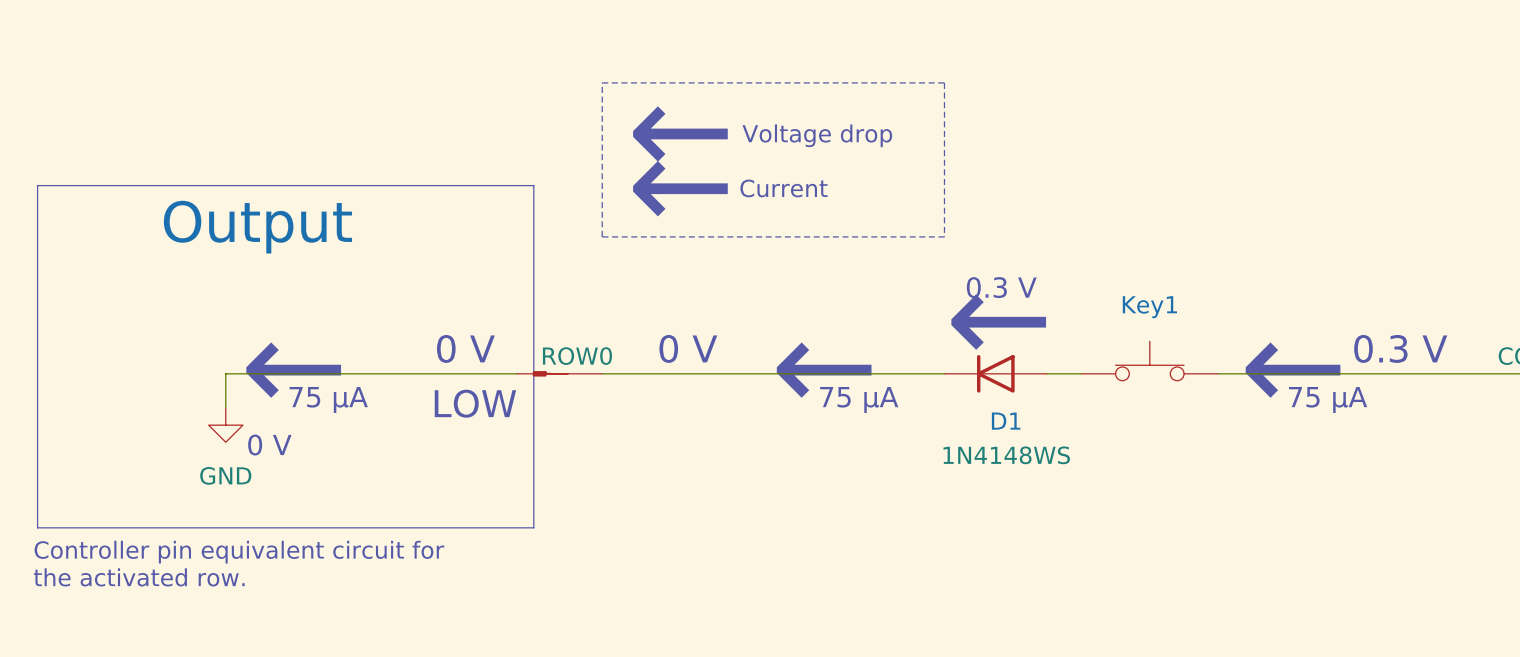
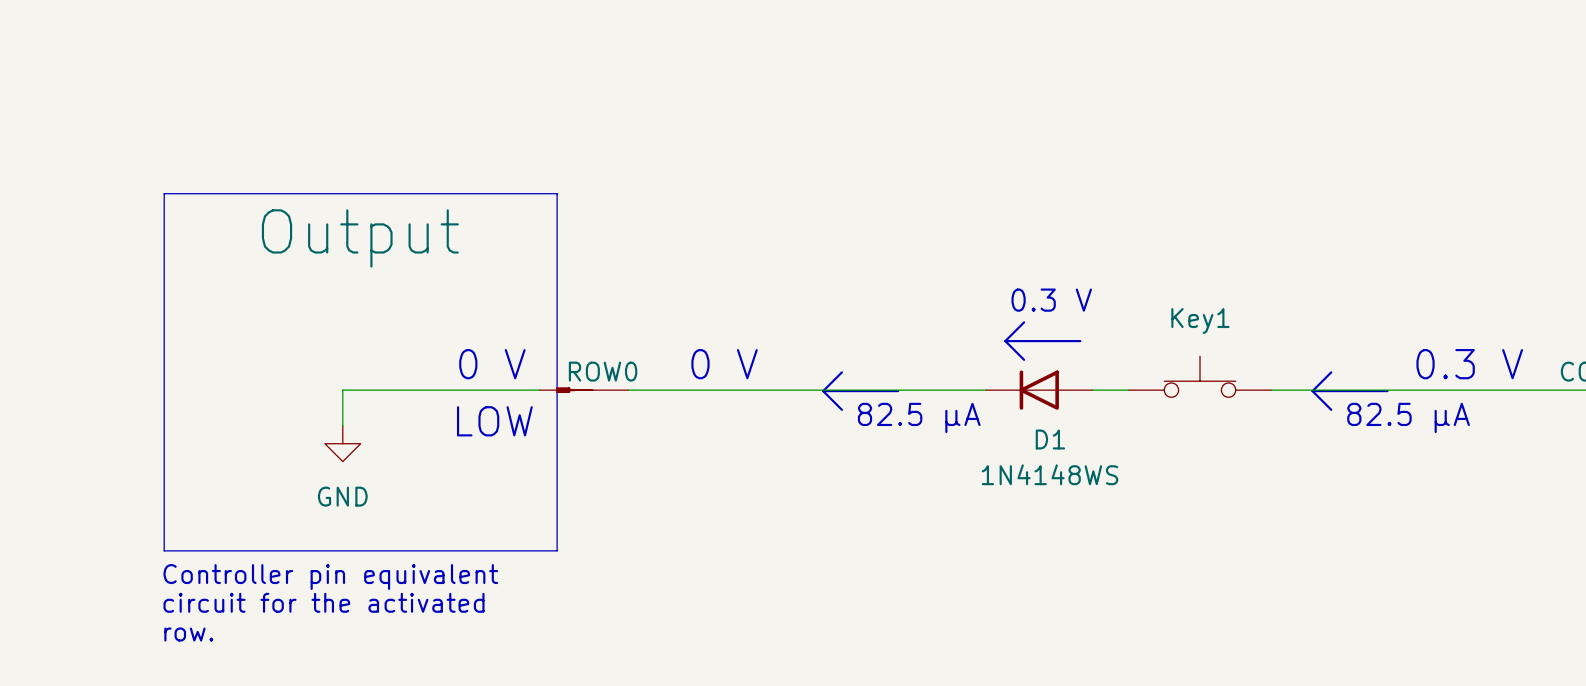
line: (602, 82) (944, 82) (944, 236) (602, 236) (602, 82) -> none
text: ← (680, 133) -> none
text: Voltage drop (817, 135) -> none
line: (157, 185) (37, 185) (37, 527) (157, 527) -> (164, 193) (164, 550)
text: ← (680, 188) -> none
text: Current (784, 188) -> none
Output name position: Output (257, 227) -> Output (360, 238)
text: ← (293, 370) -> none
wire: (328, 373) (225, 373) (225, 408) -> (342, 390) (342, 425)
text: 75 µA (328, 399) -> none
text: 75 µA (859, 399) -> 82.5 µA (919, 417)
text: 75 µA (1328, 399) -> 82.5 µA (1408, 417)
power symbol position: GND (225, 425) -> GND (342, 443)
text: 0 V (269, 445) -> none
text: Controller pin equivalent circuit for (239, 552) -> Controller pin equivalent (330, 577)
text: the activated row. (139, 577) -> circuit for the activated (324, 602)
text: none -> row. (188, 634)

